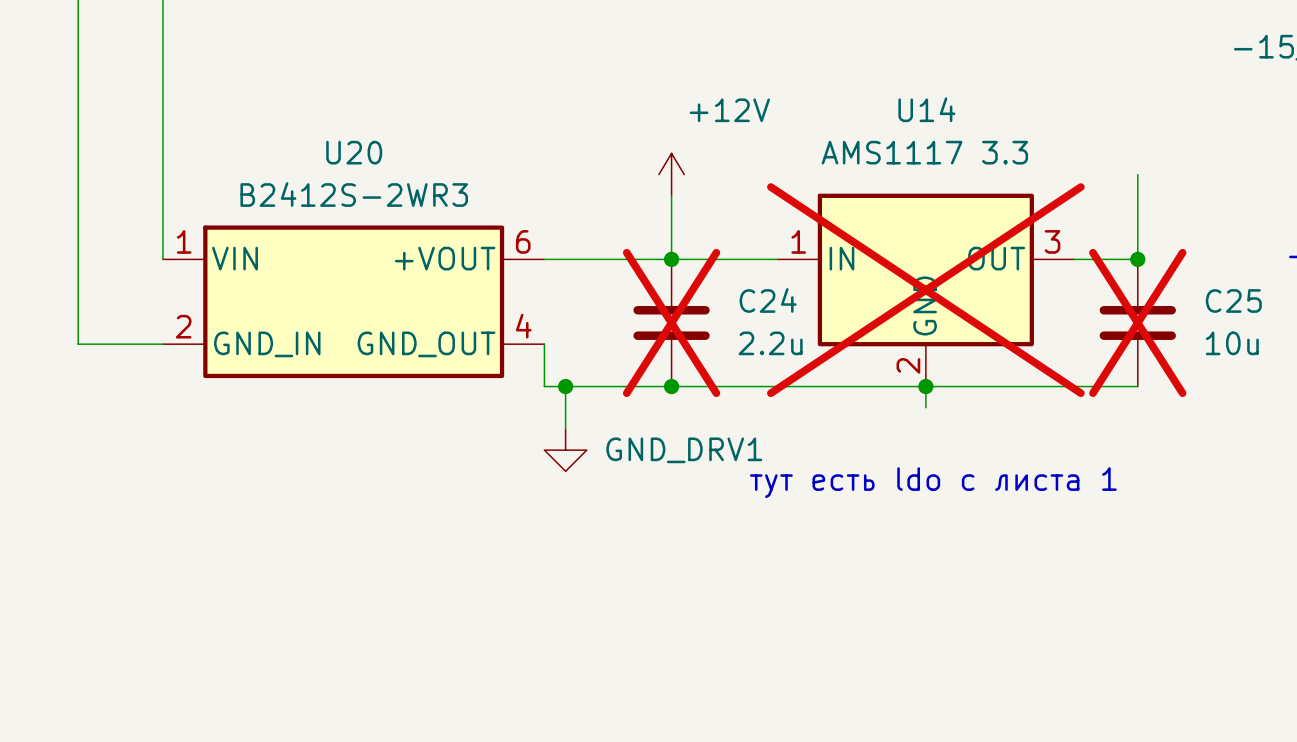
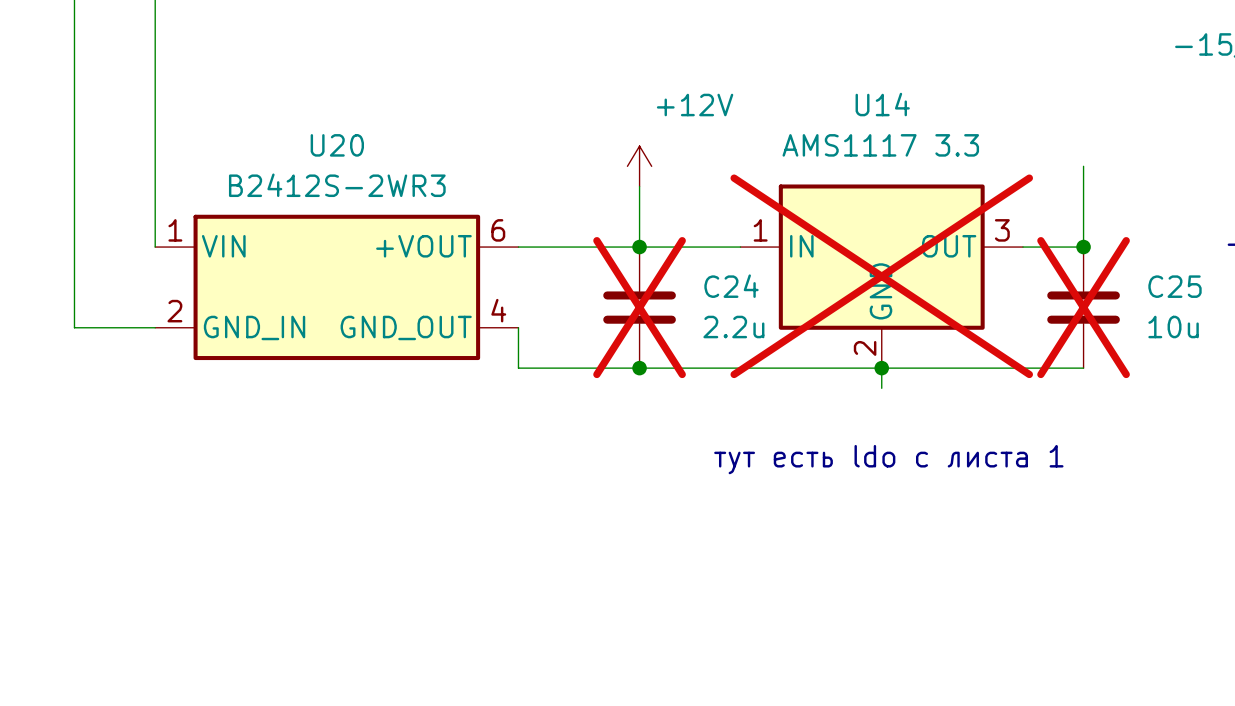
wire: (565, 386) (565, 428) -> none
junction: (565, 386) -> none
power symbol: GND_DRV1 (565, 450) -> none

